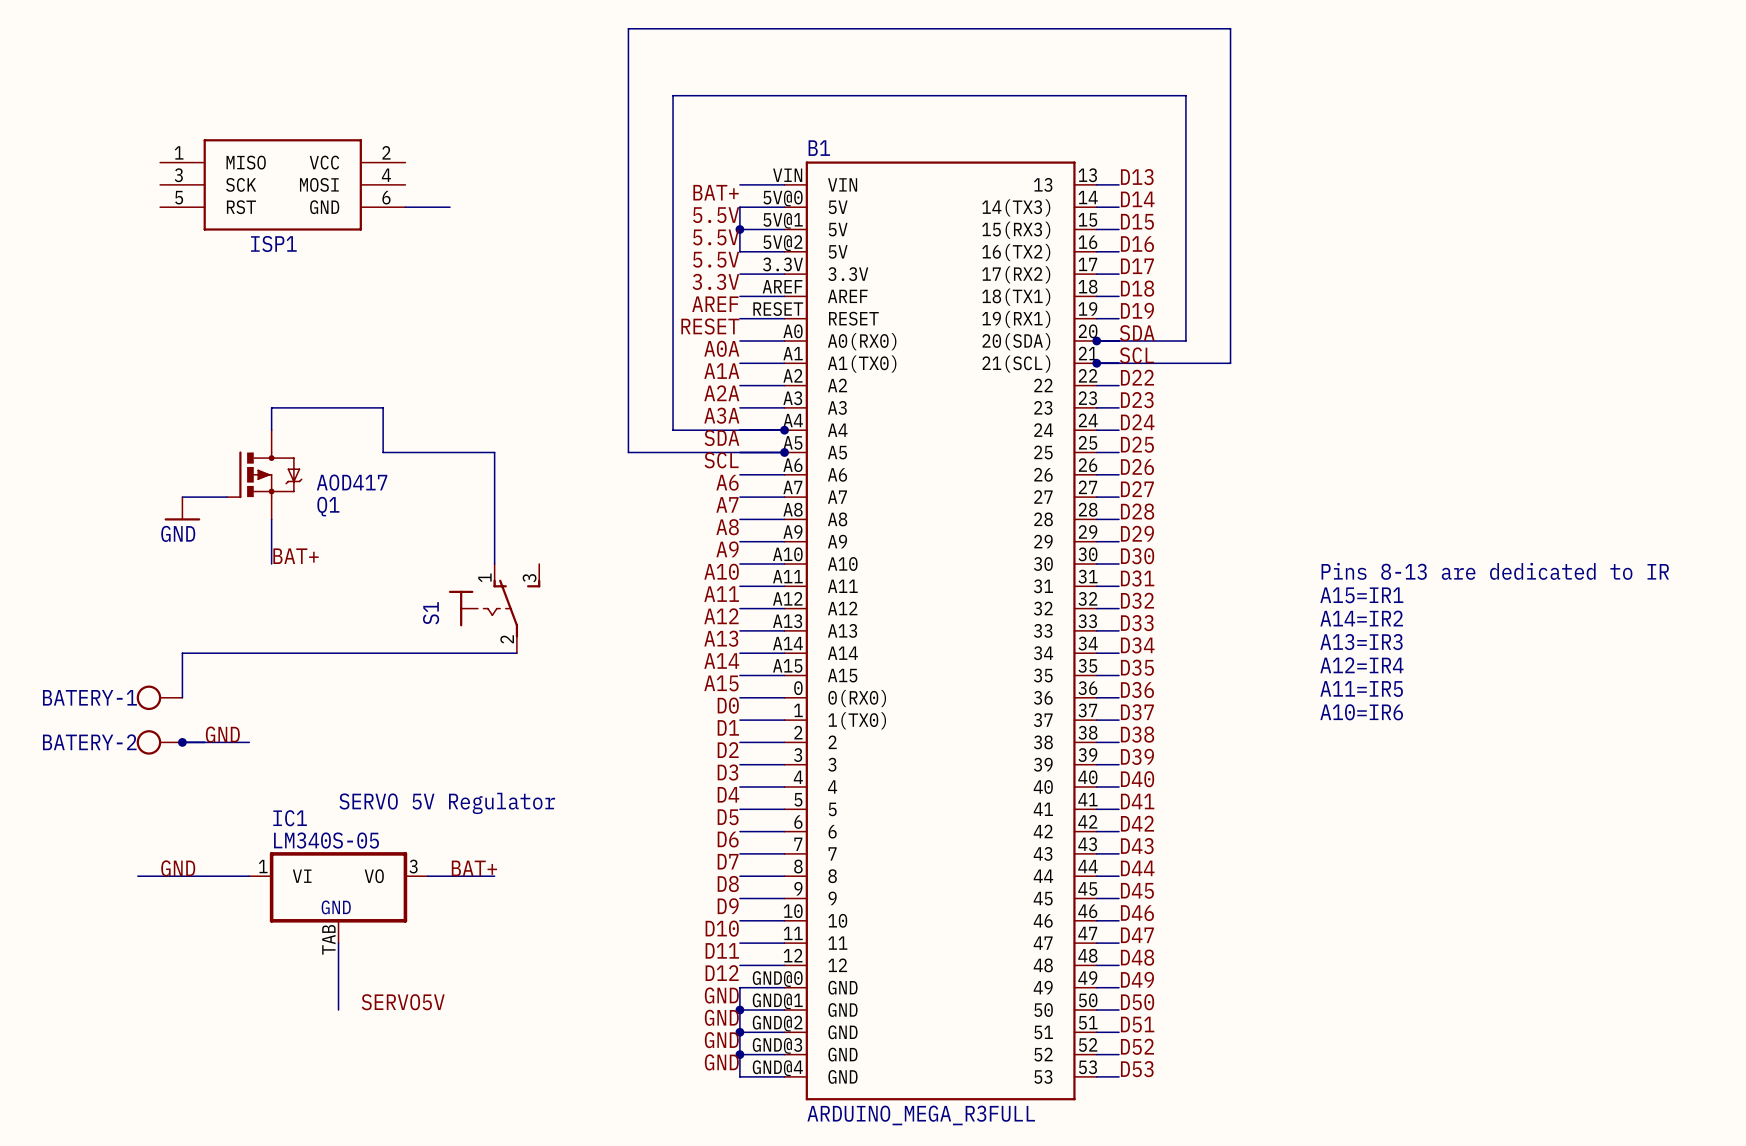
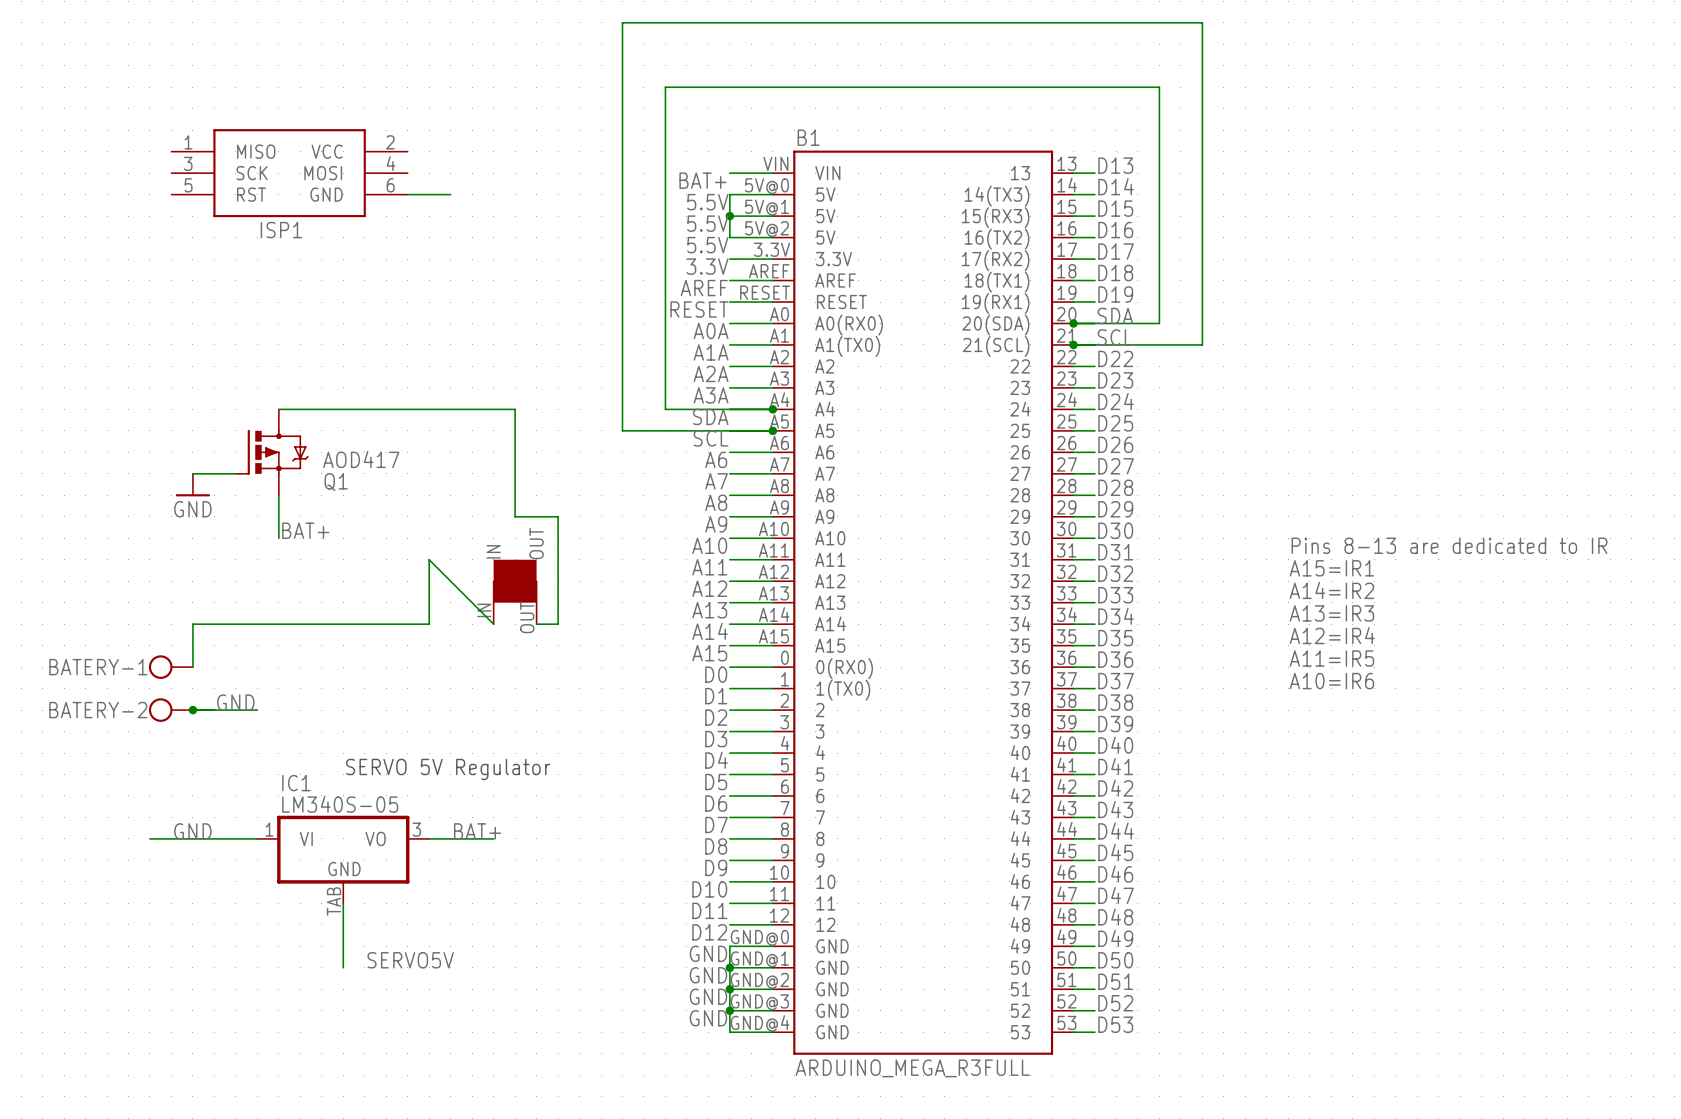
wire: (271, 430) (271, 407) (383, 407) (383, 452) (494, 452) (494, 564) -> (278, 409) (515, 409) (515, 516) (558, 516) (558, 624) (536, 624)
S1: (494, 608) -> none
part: none -> (515, 591)
wire: (427, 653) (516, 653) -> (429, 624) (429, 559) (493, 624)

